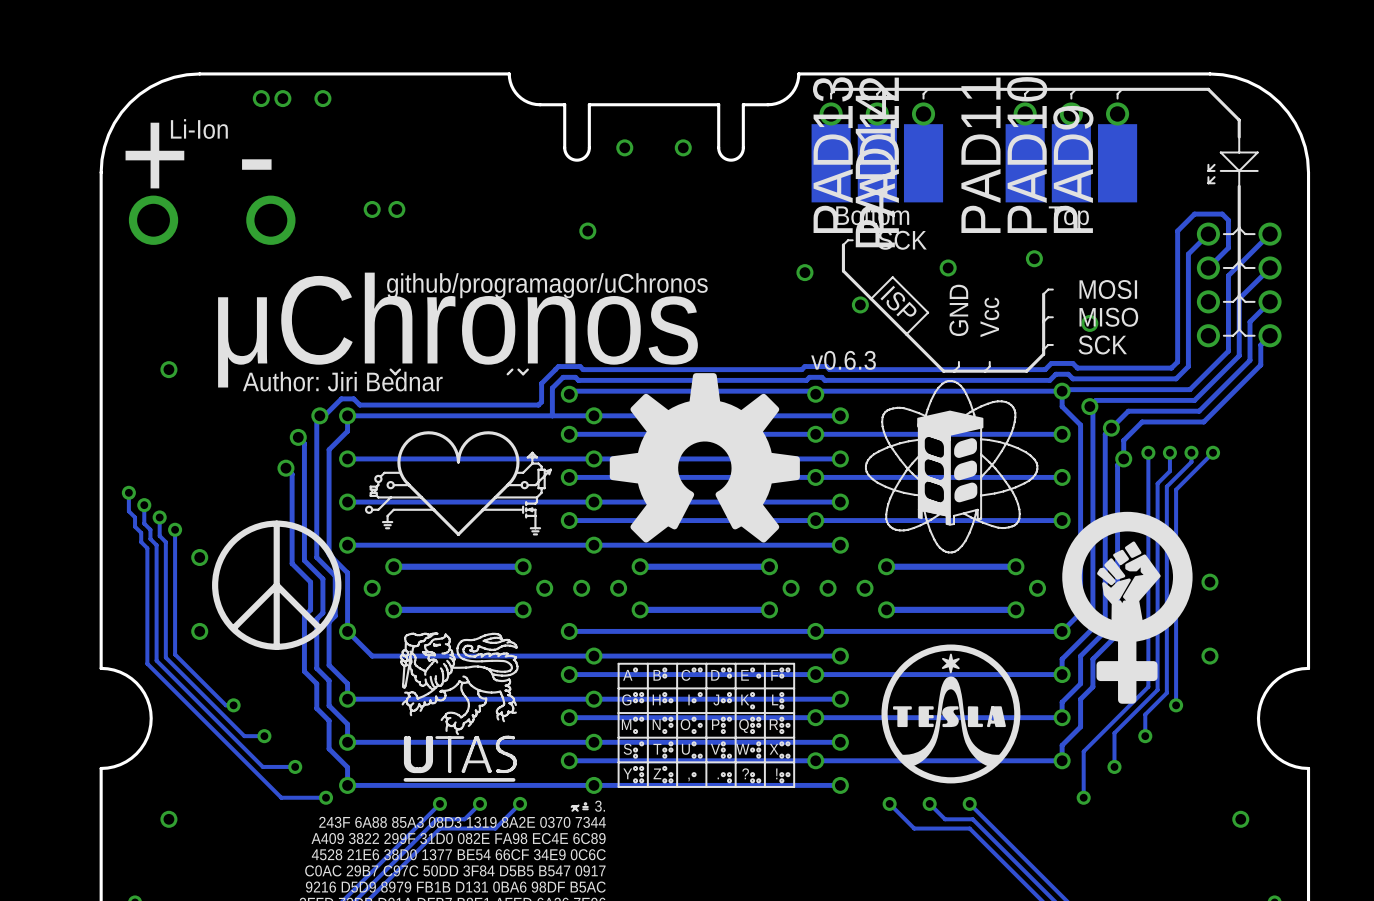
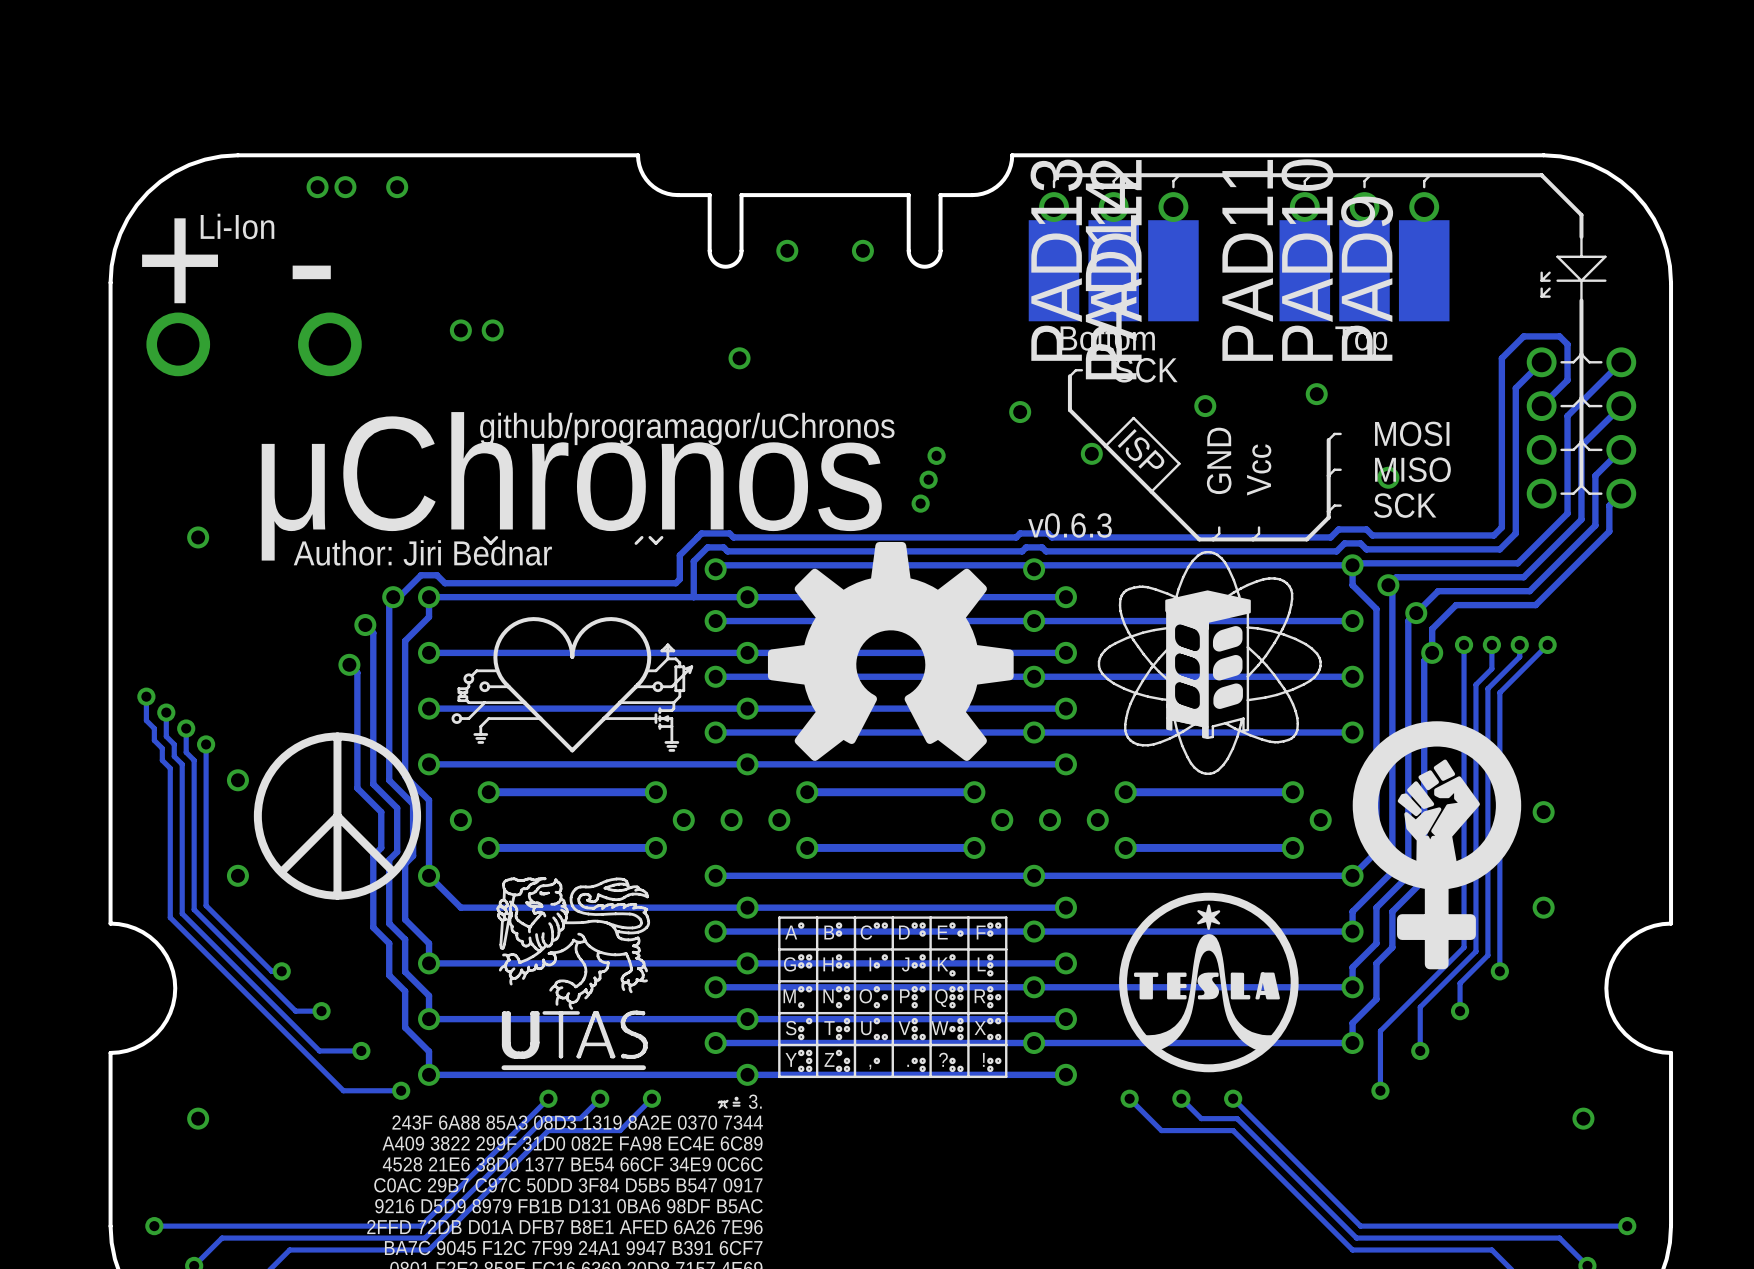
via: none -> (936, 455)
via: none -> (928, 479)
via: none -> (920, 503)

